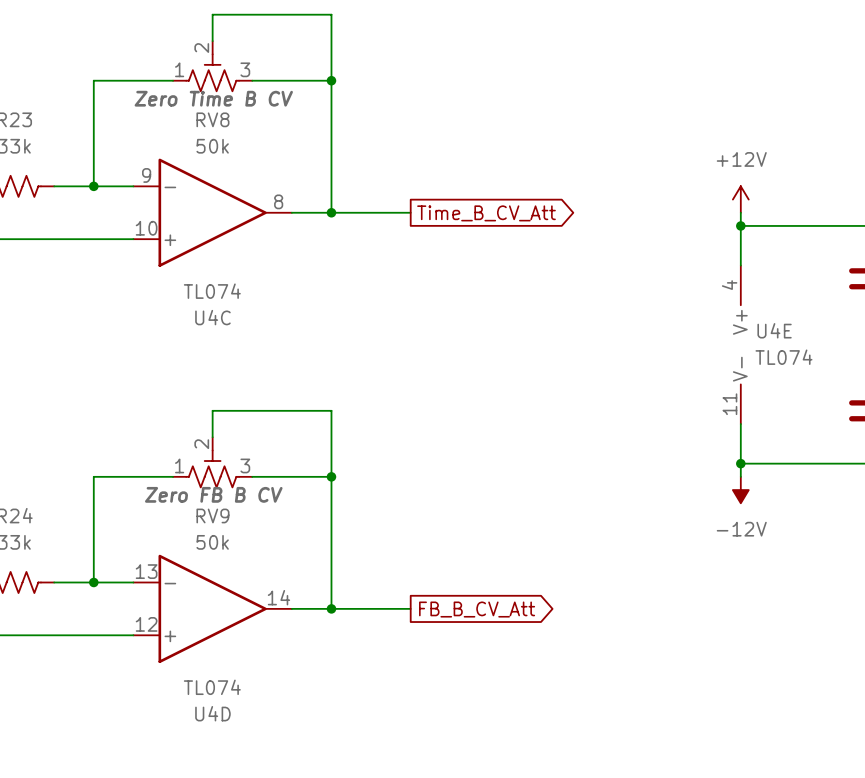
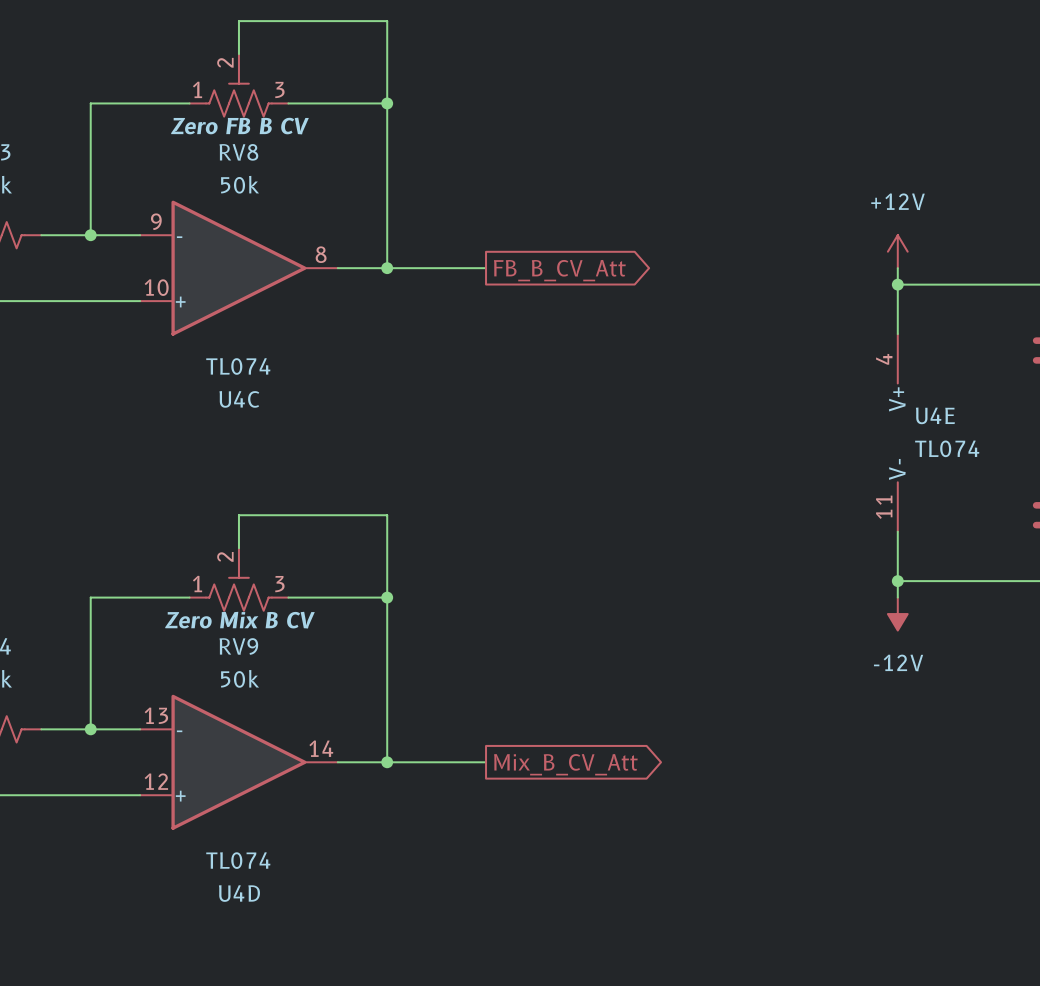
RV8 text: Zero Time B CV (213, 98) -> Zero FB B CV (239, 126)
global label: Time_B_CV_Att (486, 213) -> FB_B_CV_Att (559, 270)
RV9 text: Zero FB B CV (213, 494) -> Zero Mix B CV (239, 620)
global label: FB_B_CV_Att (477, 609) -> Mix_B_CV_Att (565, 764)

